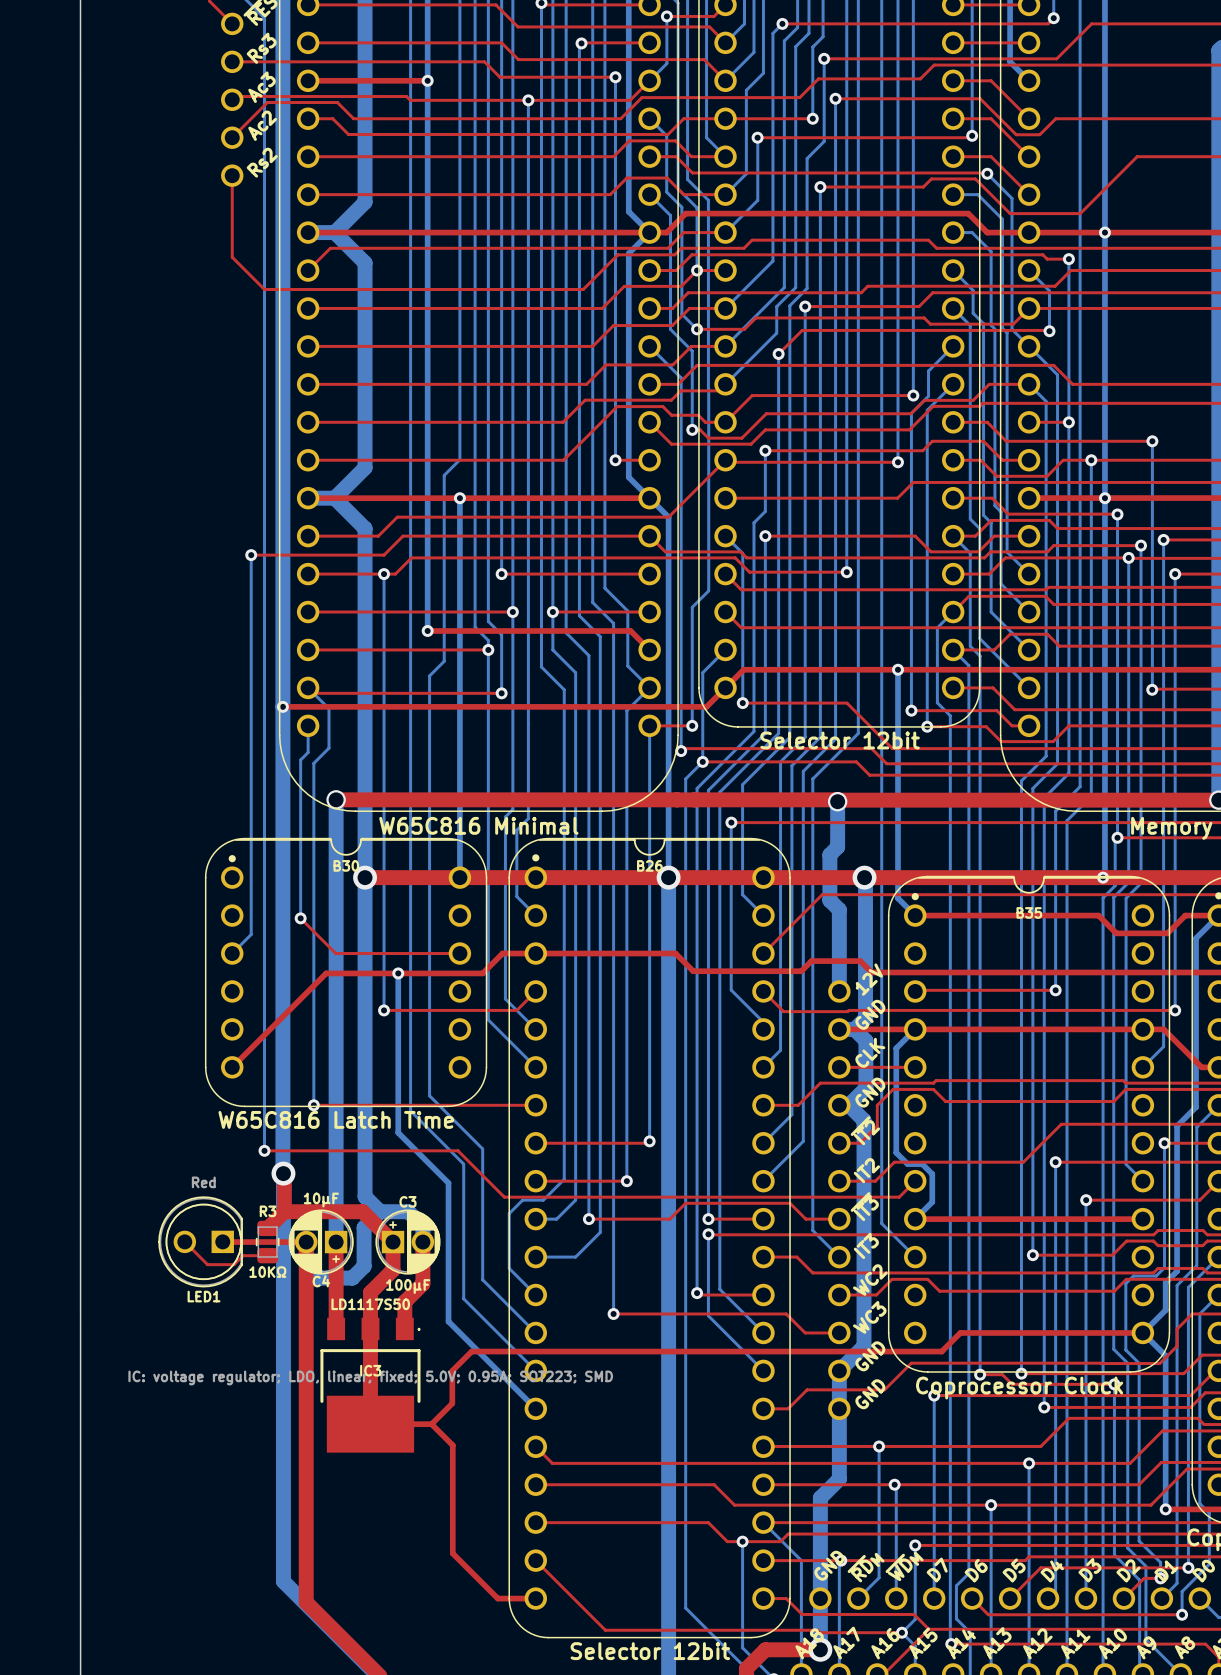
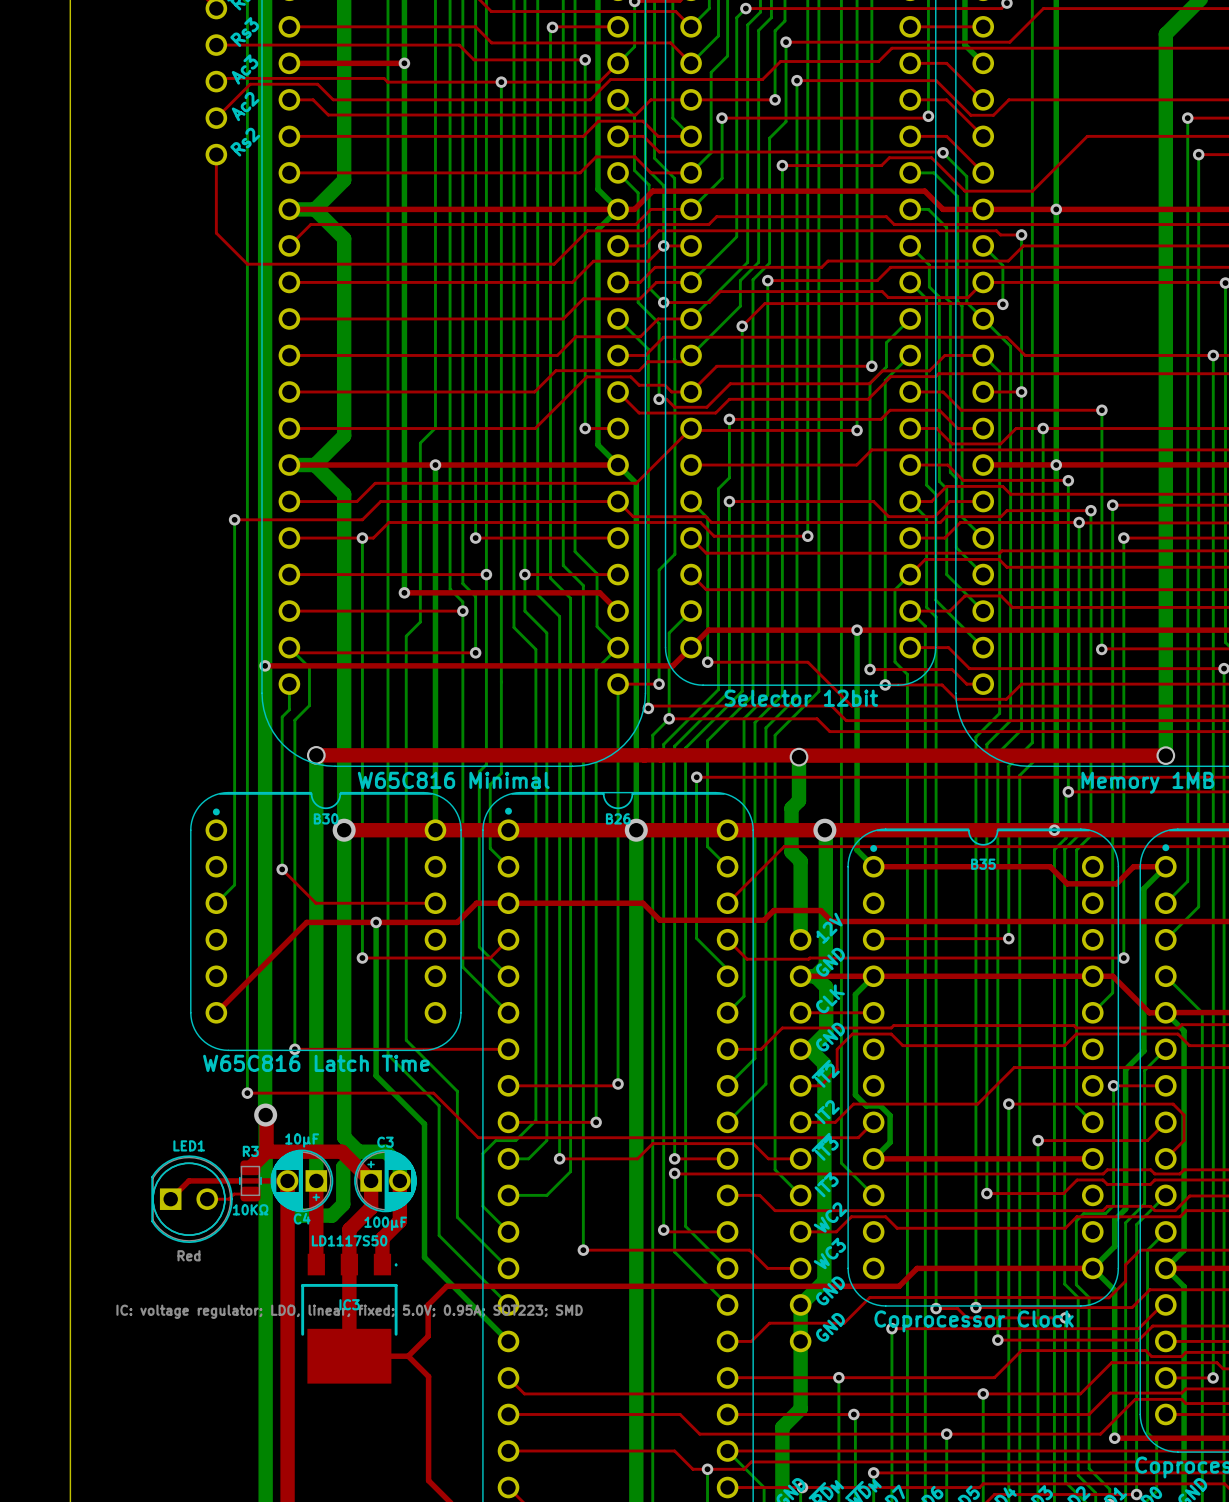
top track: (184, 1241) (207, 1264) (234, 1264) (243, 1255) (250, 1255) -> (207, 1199) (228, 1199) (234, 1194)
LED1 rotation: 0° (200, 1241) -> 180° (192, 1199)
top track: none -> (207, 1180) (188, 1180) (170, 1199)

